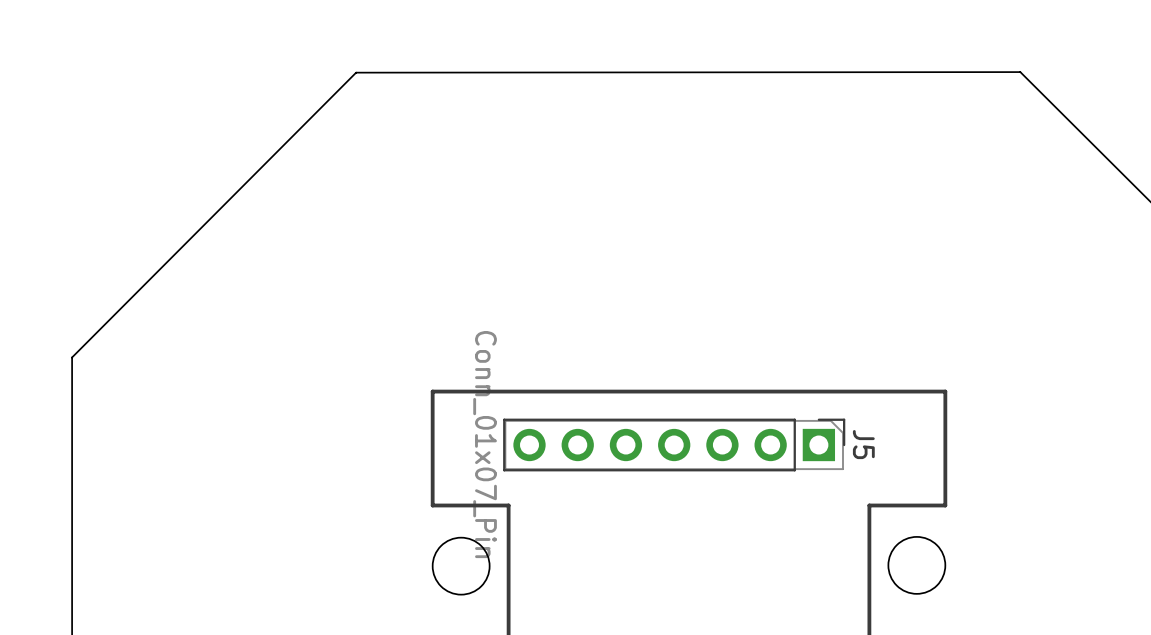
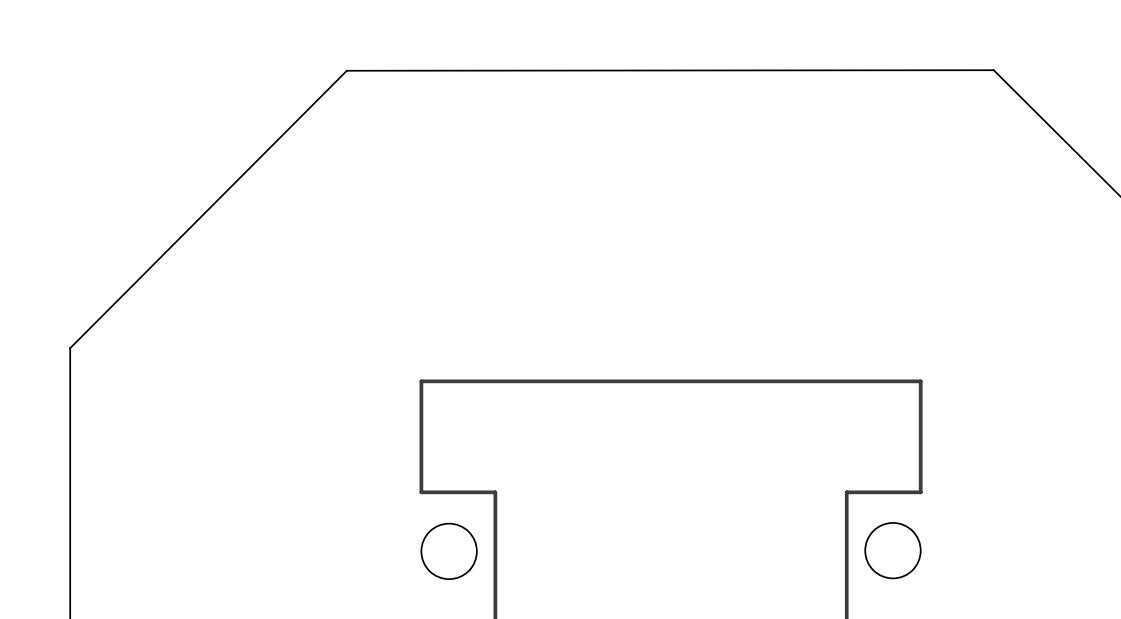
J5: Conn_01x07_Pin (674, 445) -> none

